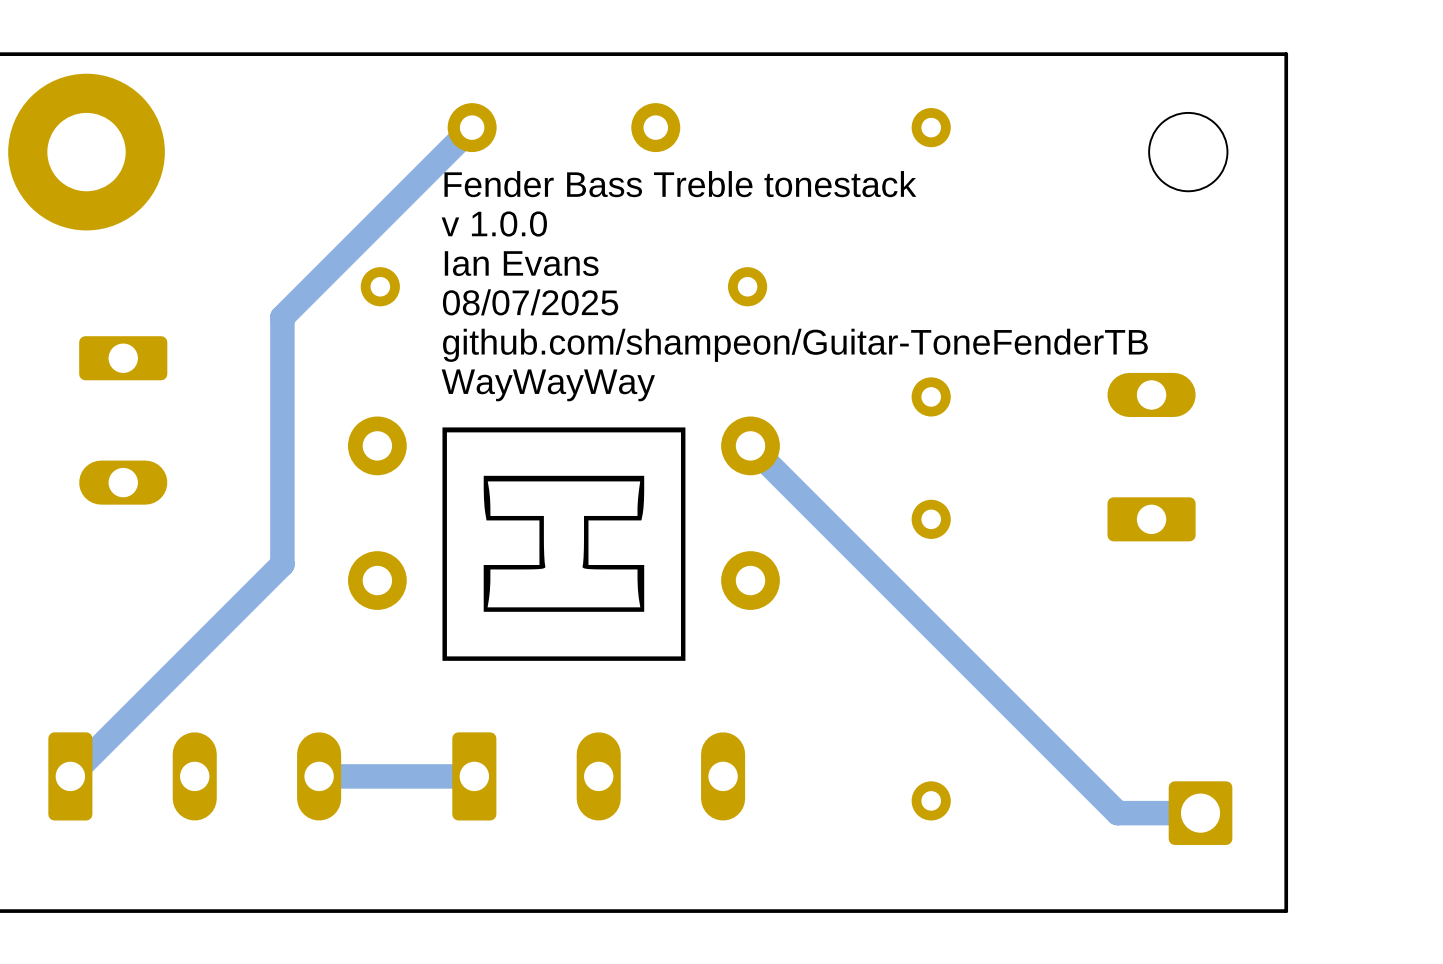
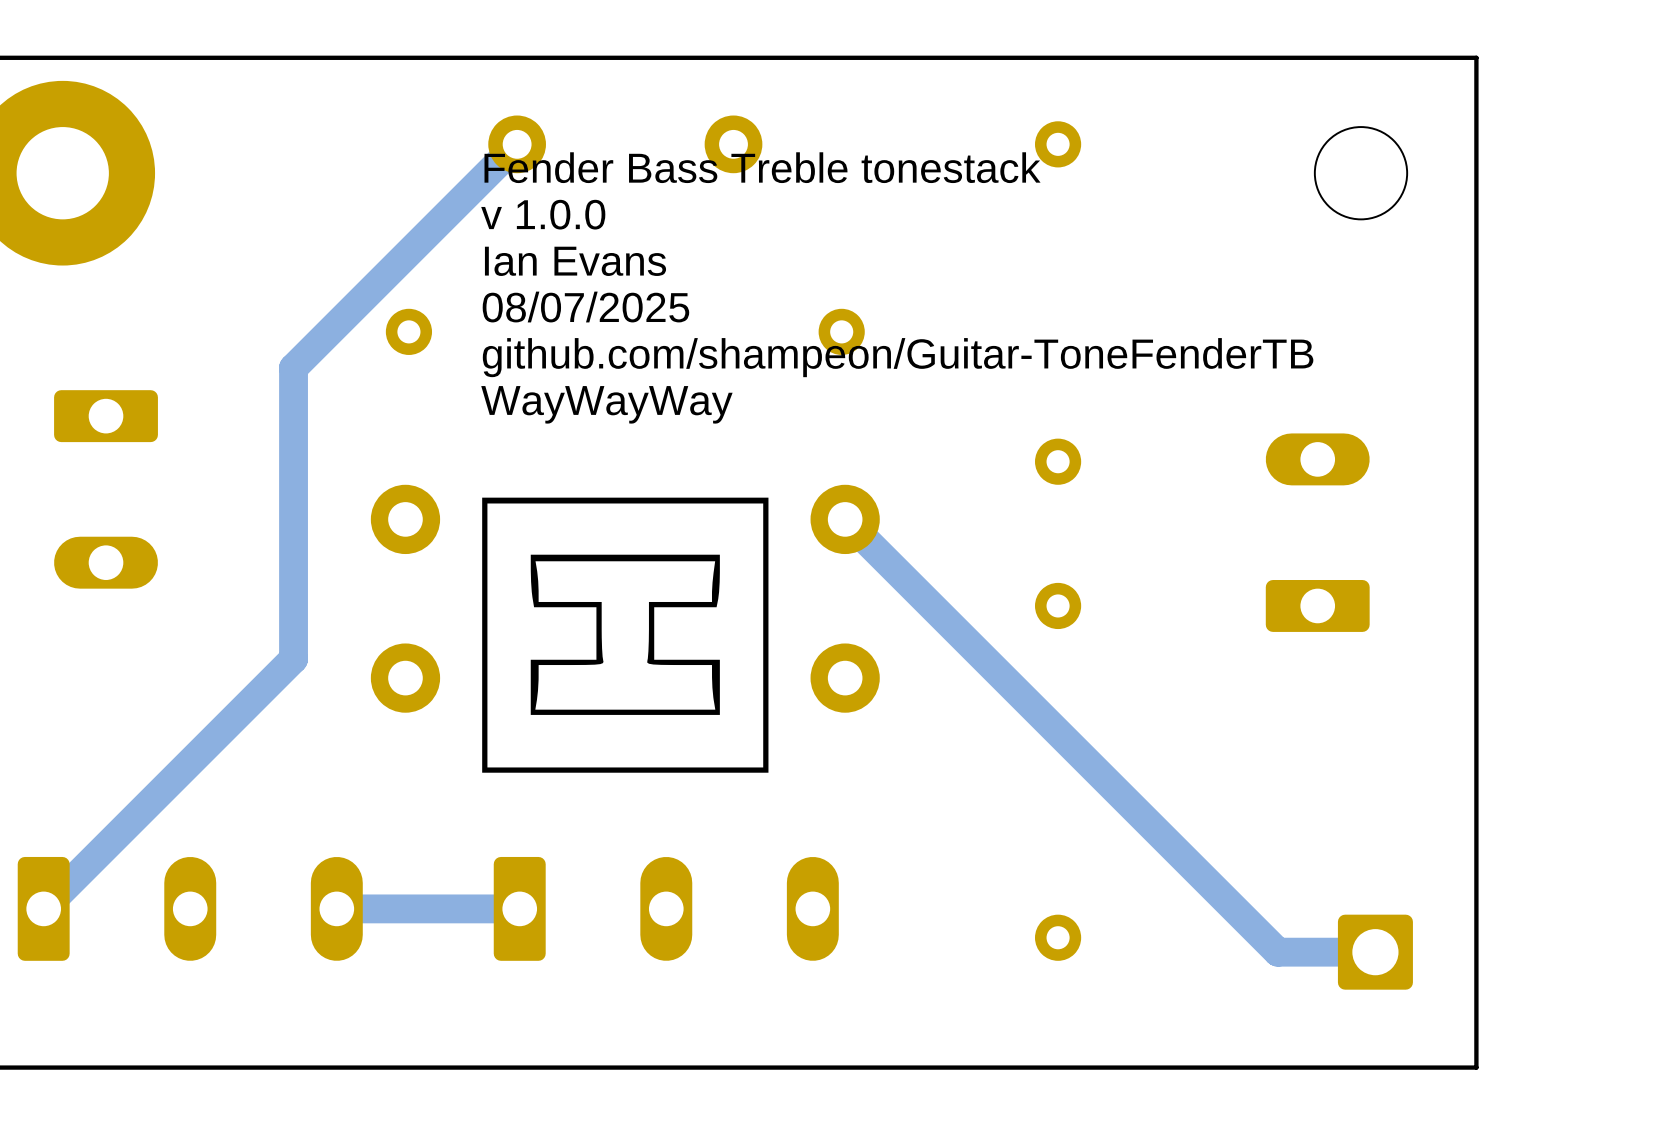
text position: Fender Bass Treble tonestack (680, 184) -> Fender Bass Treble tonestack (762, 167)
text position: v 1.0.0 (494, 224) -> v 1.0.0 (543, 214)
text position: Ian Evans (521, 263) -> Ian Evans (575, 261)
text position: 08/07/2025 (530, 302) -> 08/07/2025 (585, 307)
text position: github.com/shampeon/Guitar-ToneFenderTB (795, 345) -> github.com/shampeon/Guitar-ToneFenderTB (898, 357)
text position: WayWayWay (548, 385) -> WayWayWay (606, 404)

